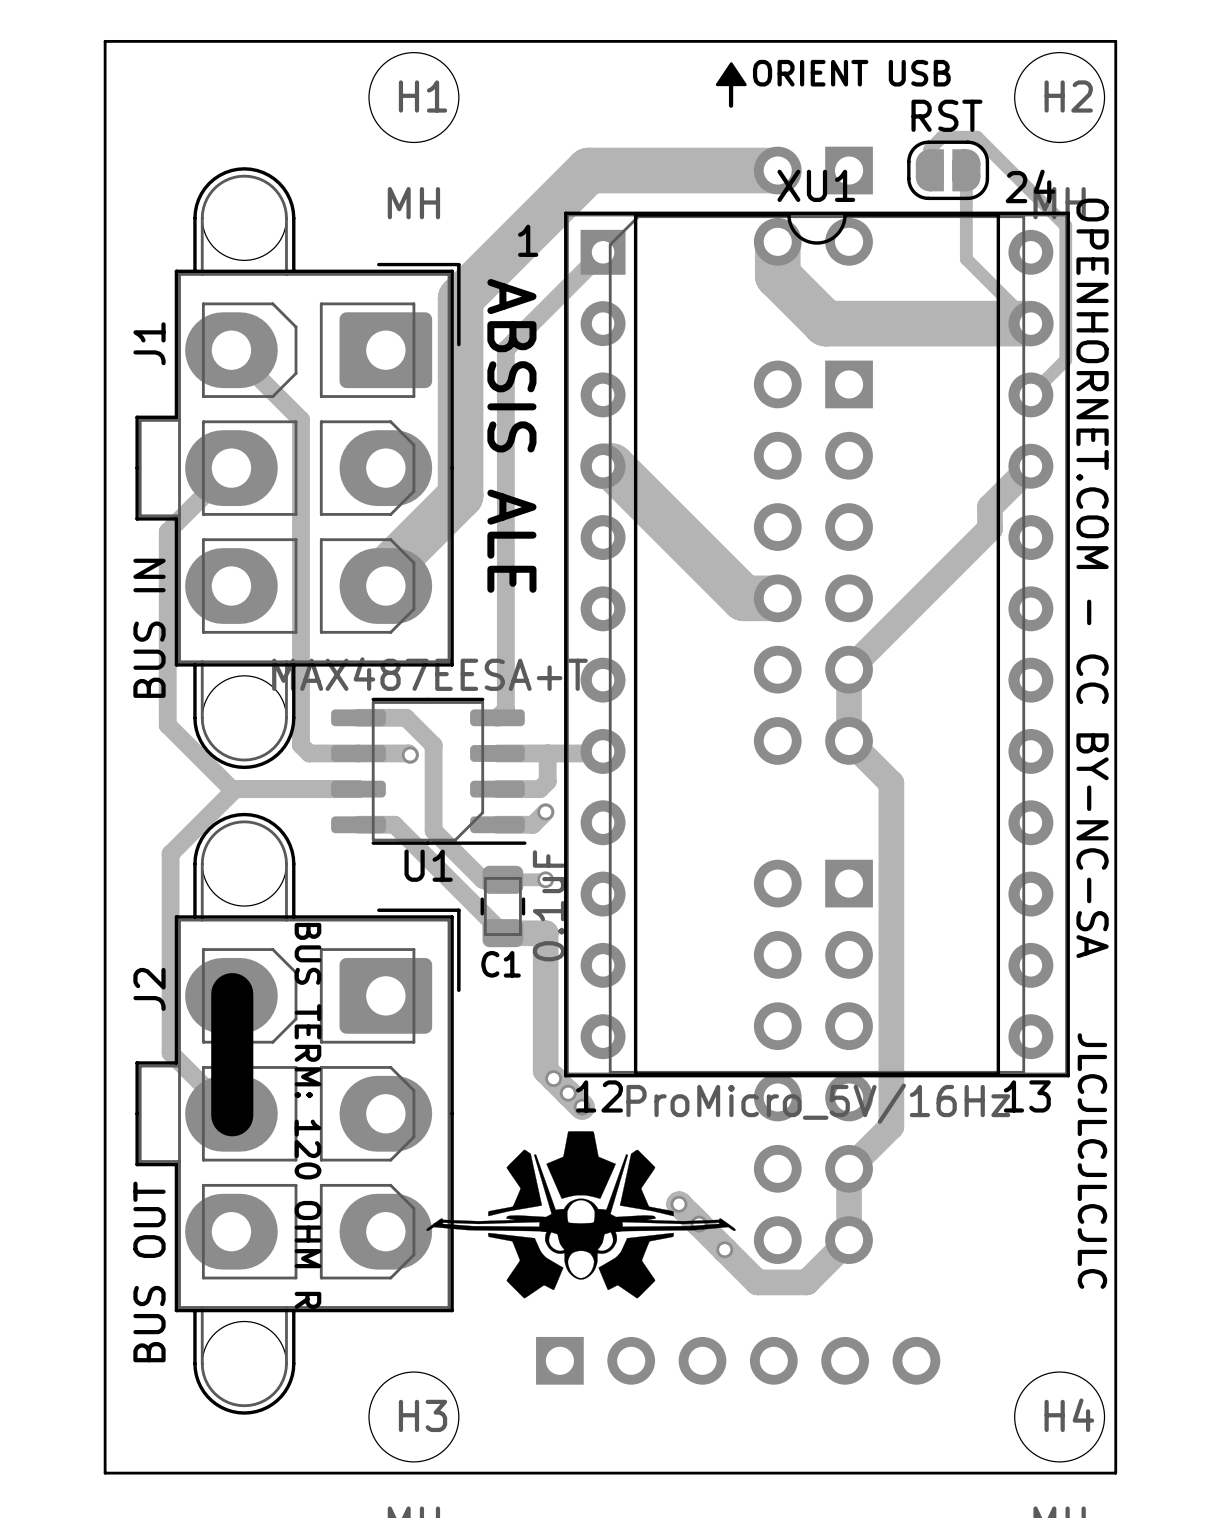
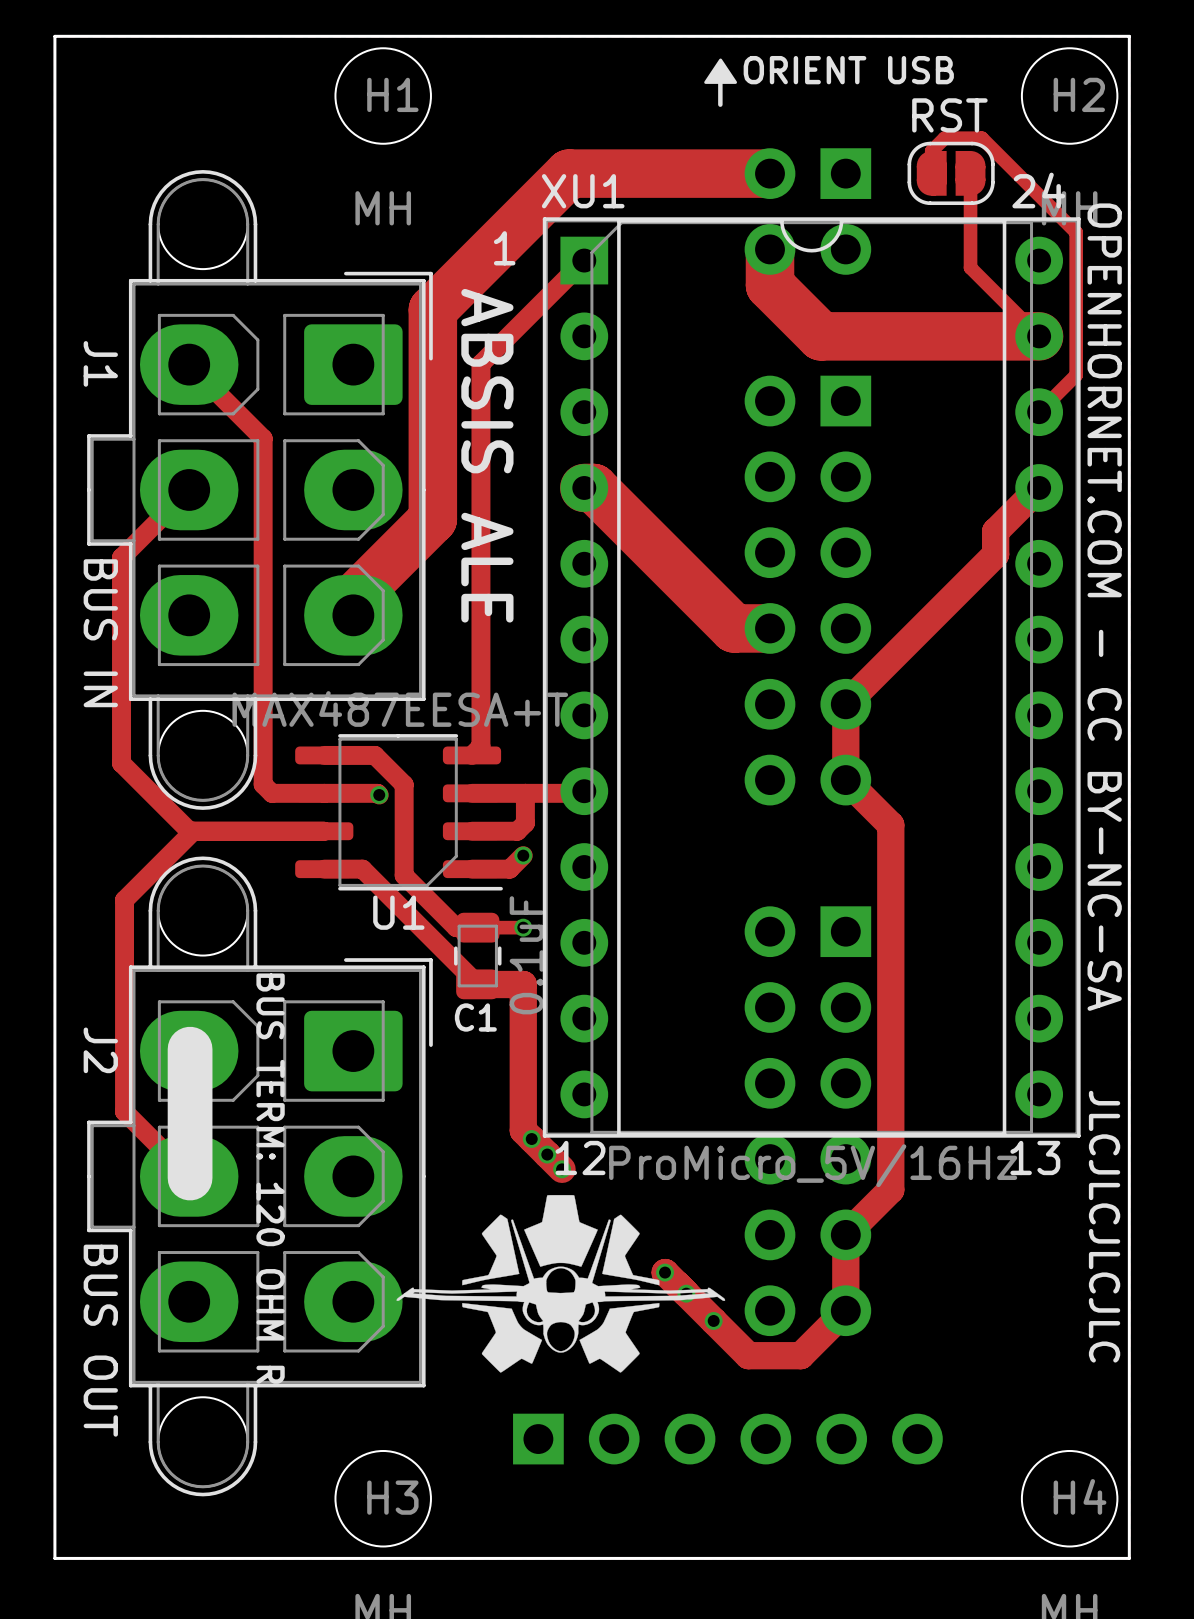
XU1 name position: XU1 (816, 185) -> XU1 (583, 191)
J1 name rotation: 0° (149, 343) -> 180° (100, 363)
J1 value rotation: 0° (149, 628) -> 180° (100, 633)
J2 name rotation: 0° (149, 989) -> 180° (100, 1050)
J2 value rotation: 0° (149, 1271) -> 180° (100, 1340)

